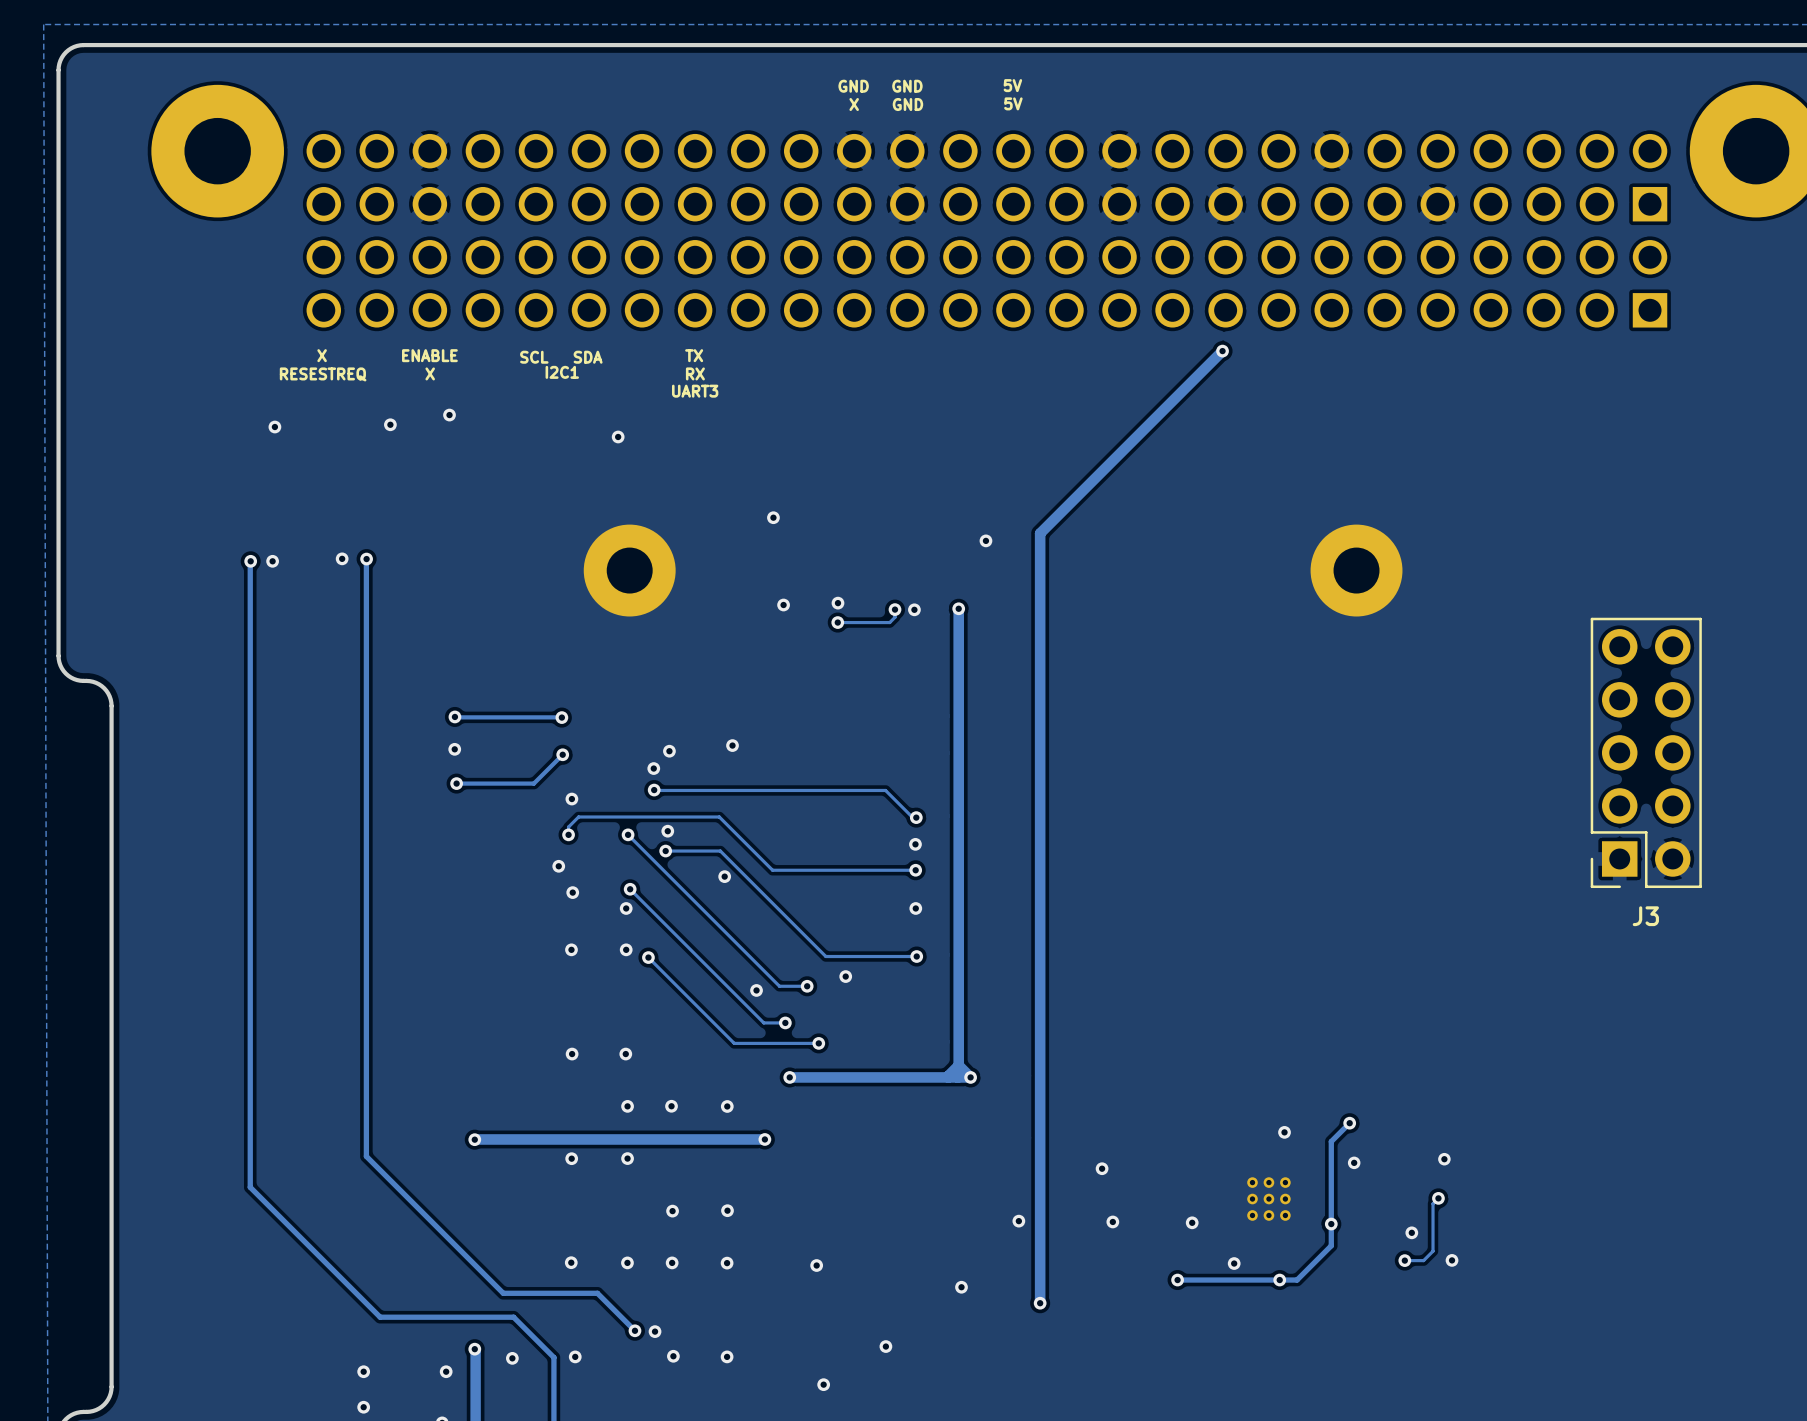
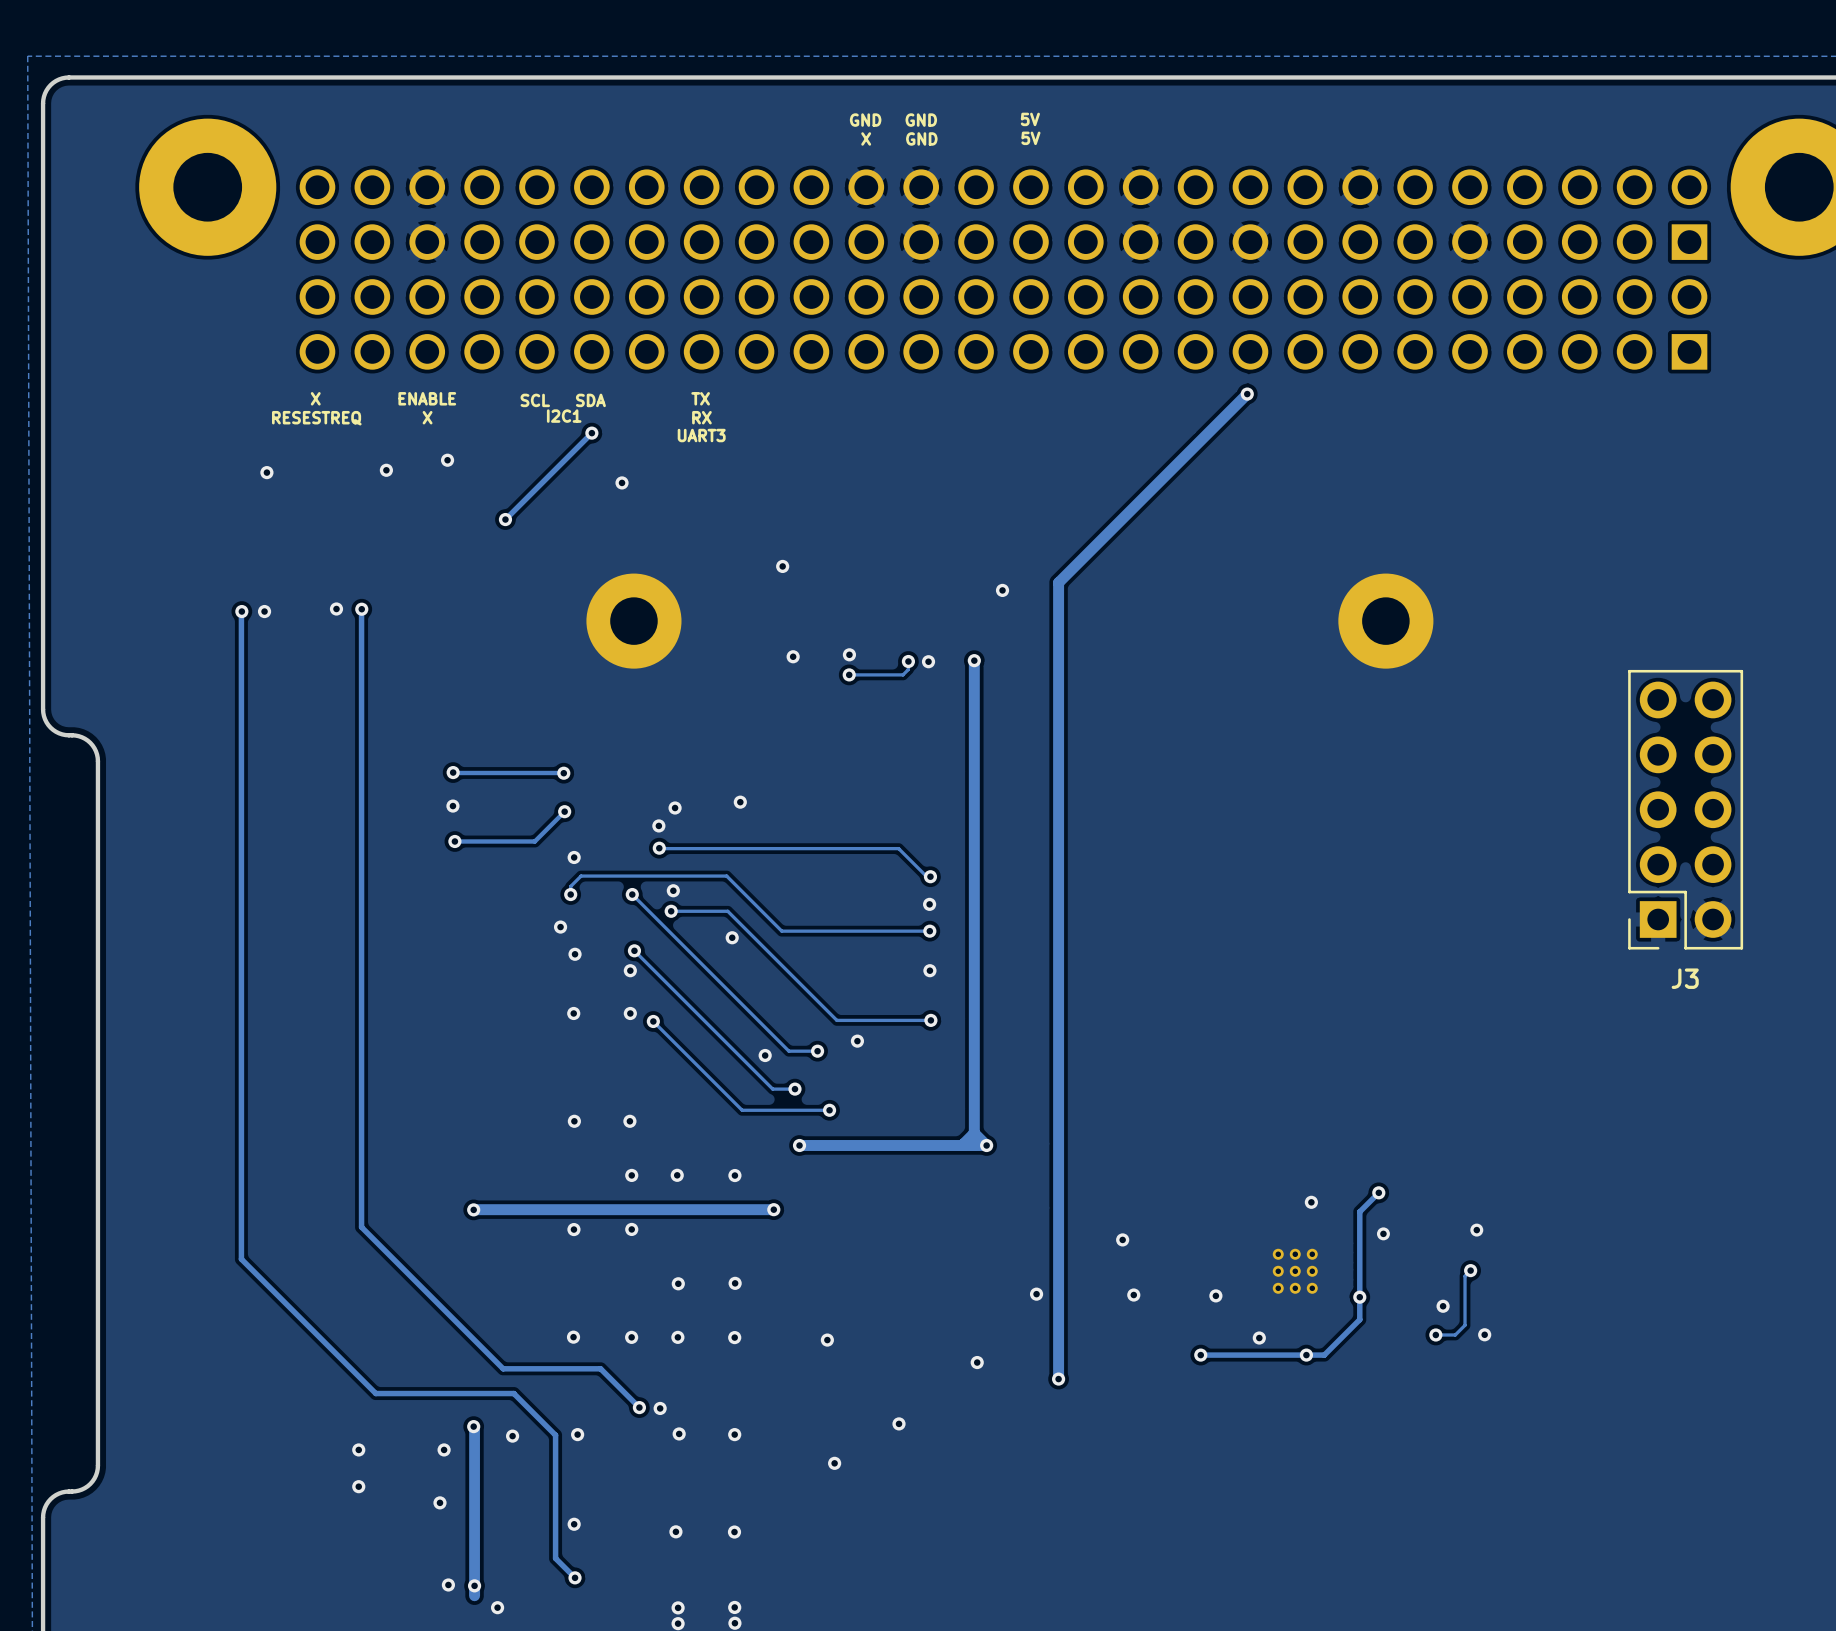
track: none -> (591, 433) (505, 519)
via: none -> (591, 433)
via: none -> (505, 519)

